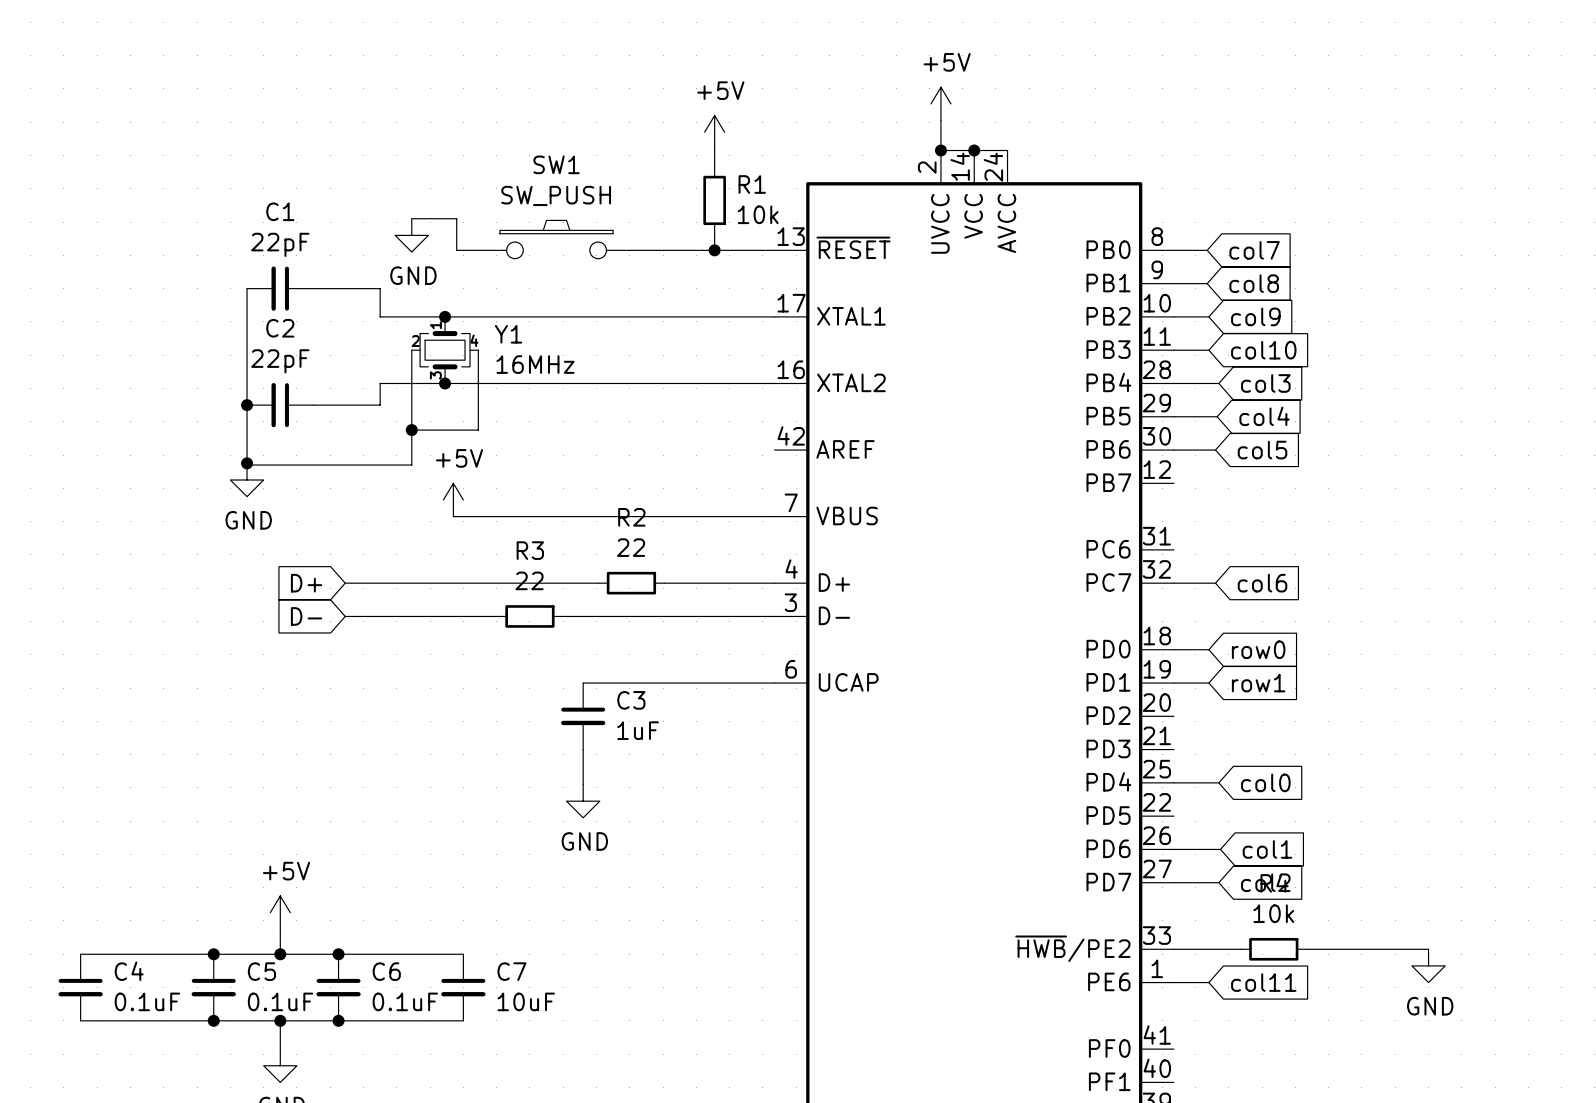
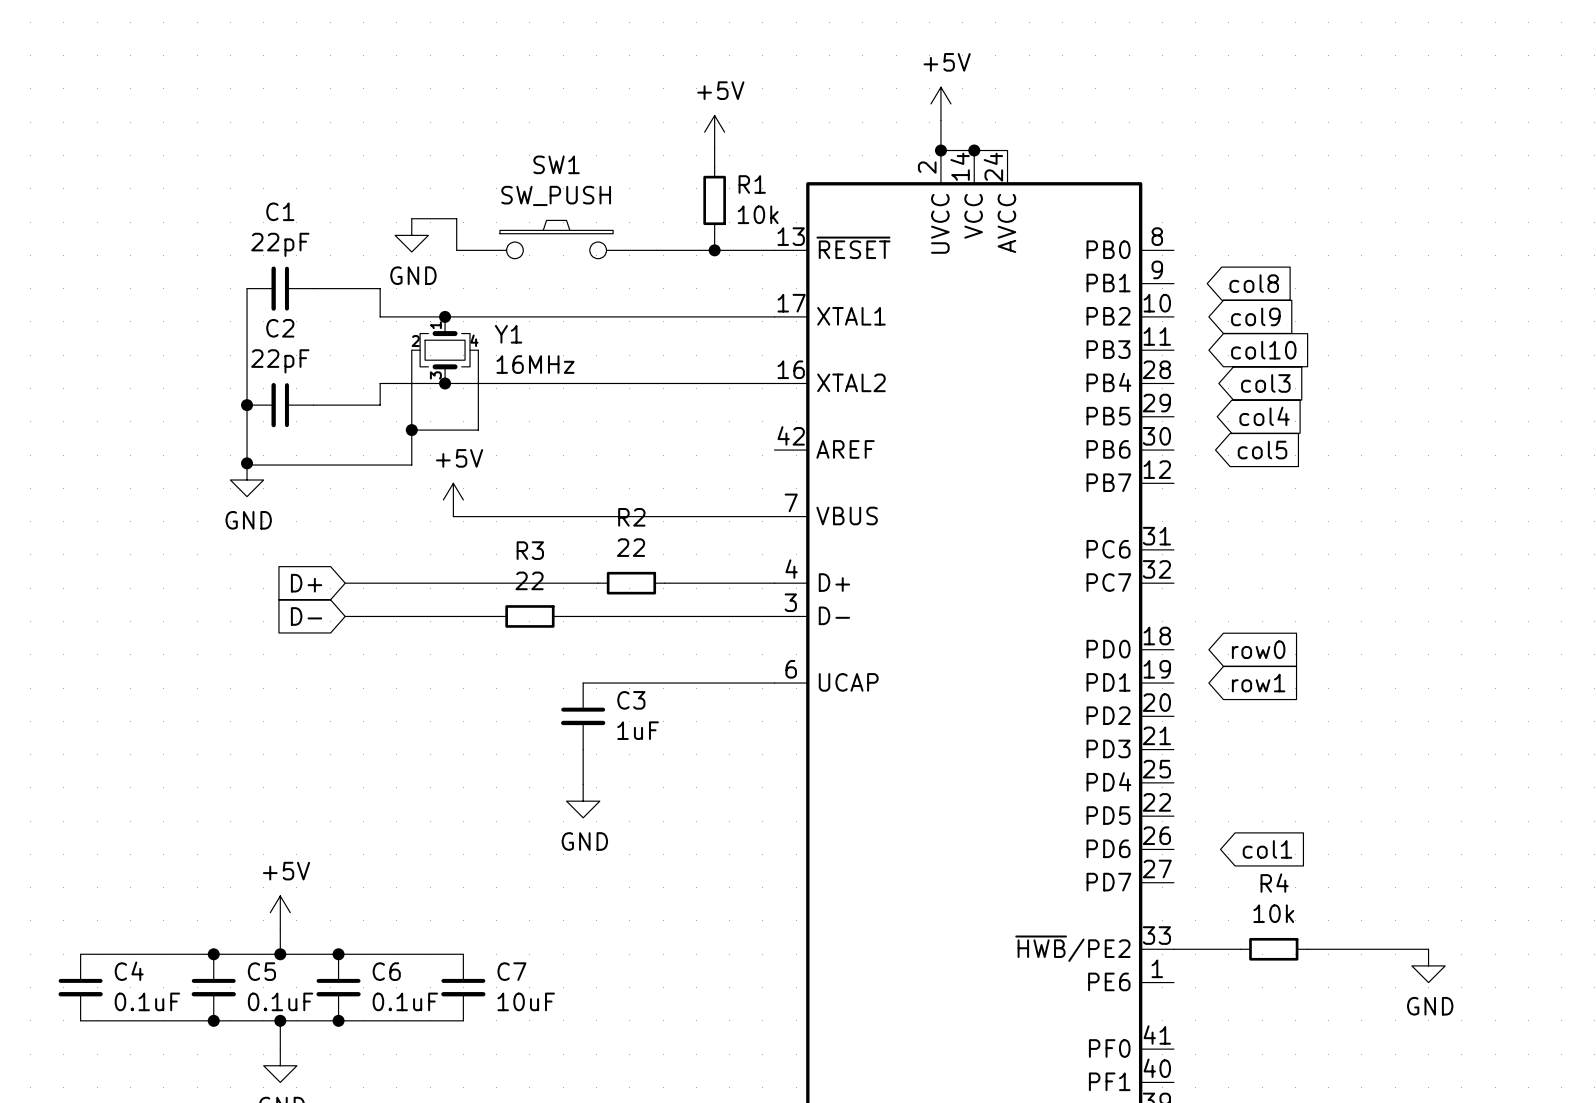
wire: (1173, 250) (1207, 250) -> none
global label: col7 (1254, 250) -> none
wire: (1173, 283) (1207, 283) -> none
wire: (1173, 316) (1208, 316) -> none
wire: (1173, 350) (1208, 350) -> none
wire: (1173, 383) (1218, 383) -> none
wire: (1173, 416) (1217, 416) -> none
wire: (1173, 450) (1215, 450) -> none
wire: (1173, 583) (1215, 583) -> none
global label: col6 (1262, 583) -> none
wire: (1173, 649) (1208, 649) -> none
wire: (1173, 683) (1208, 683) -> none
wire: (1173, 782) (1218, 782) -> none
global label: col0 (1265, 782) -> none
wire: (1173, 849) (1220, 849) -> none
wire: (1173, 882) (1218, 882) -> none
global label: col2 (1265, 882) -> none
wire: (1173, 982) (1208, 982) -> none
global label: col11 (1263, 982) -> none

